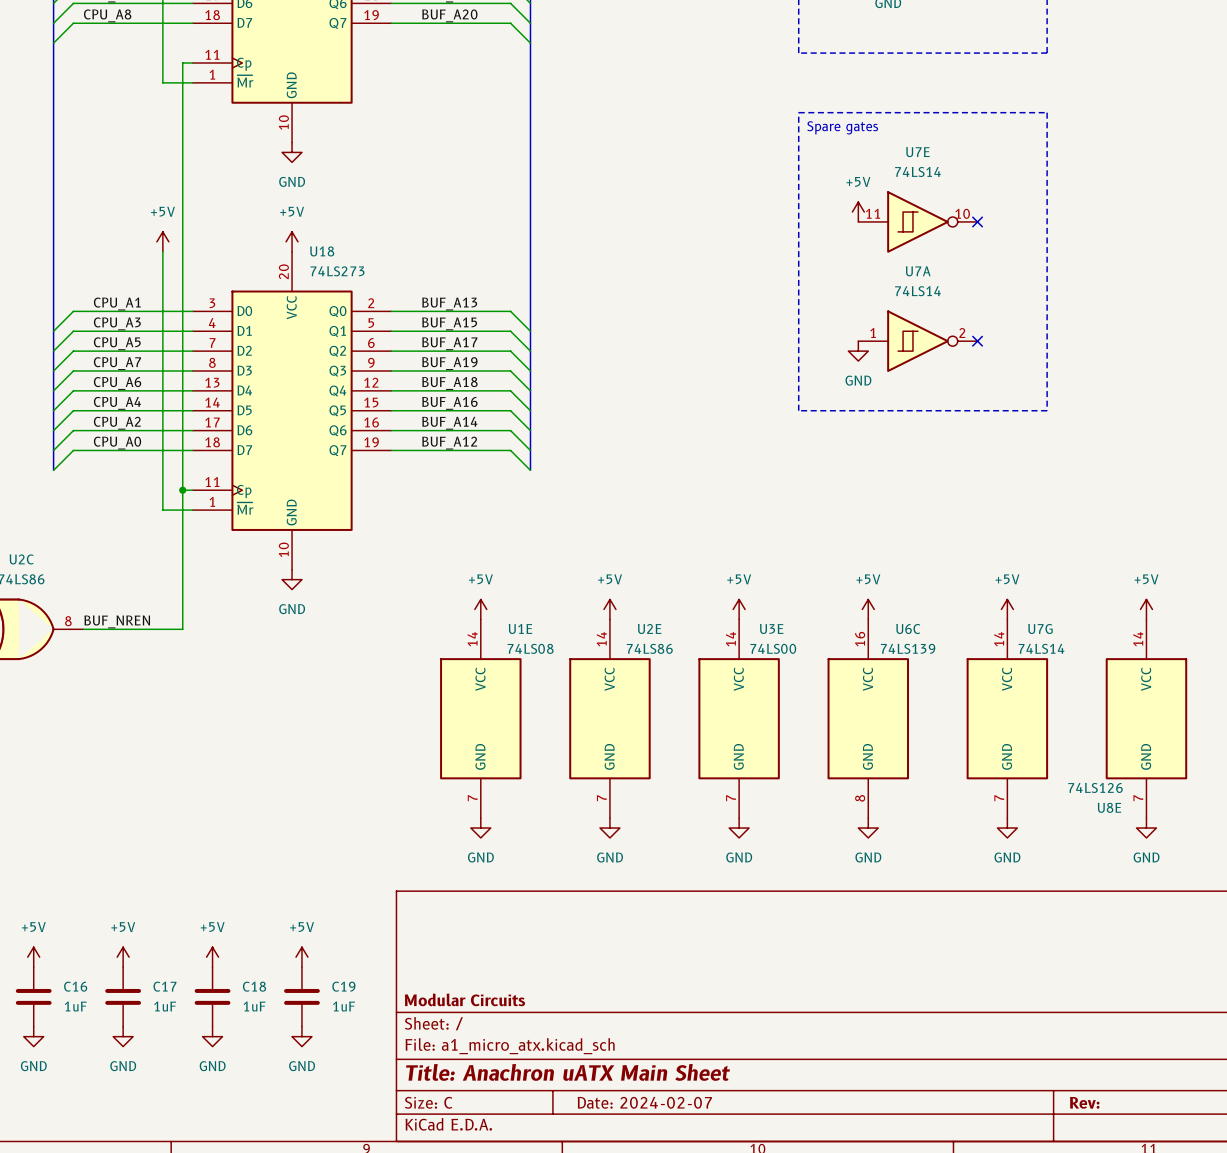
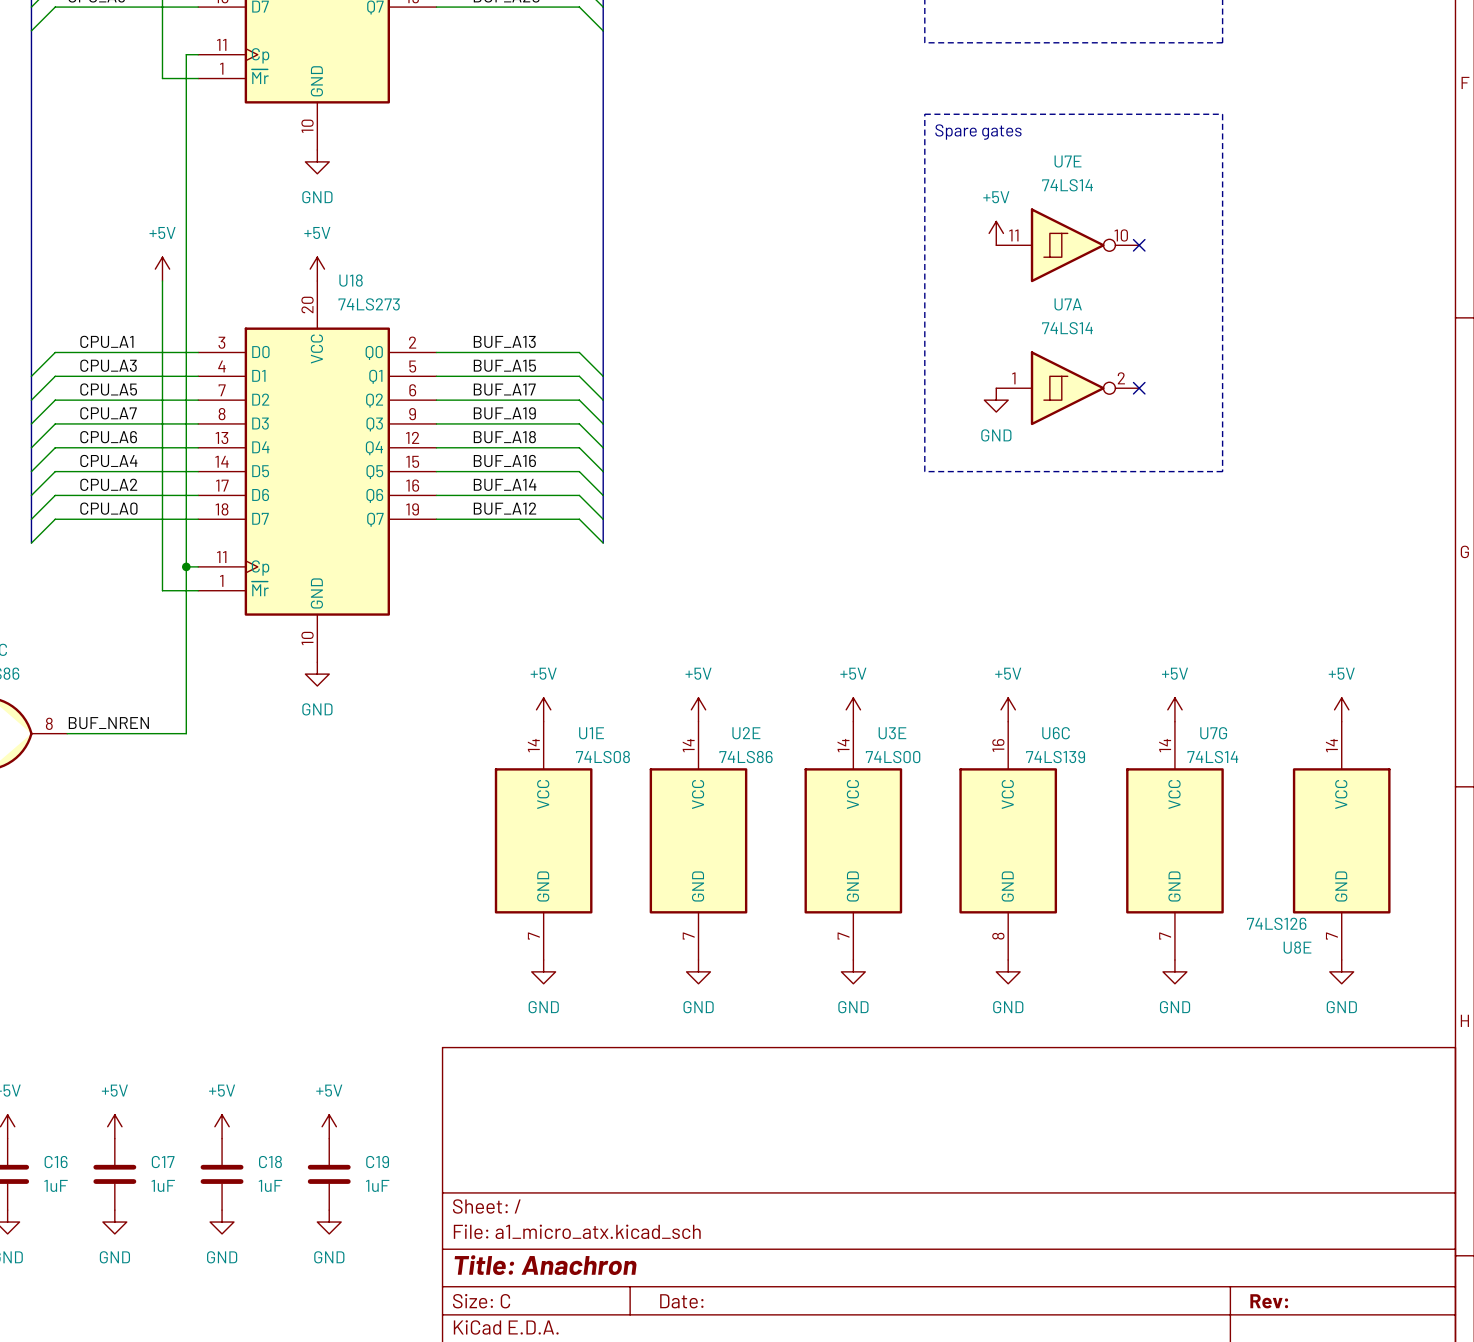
title block: Modular Circuits (464, 999) -> none
title block: Title: Anachron uATX Main Sheet (568, 1072) -> Title: Anachron (545, 1265)
title block: Date: 2024-02-07 (644, 1102) -> Date: (681, 1301)

